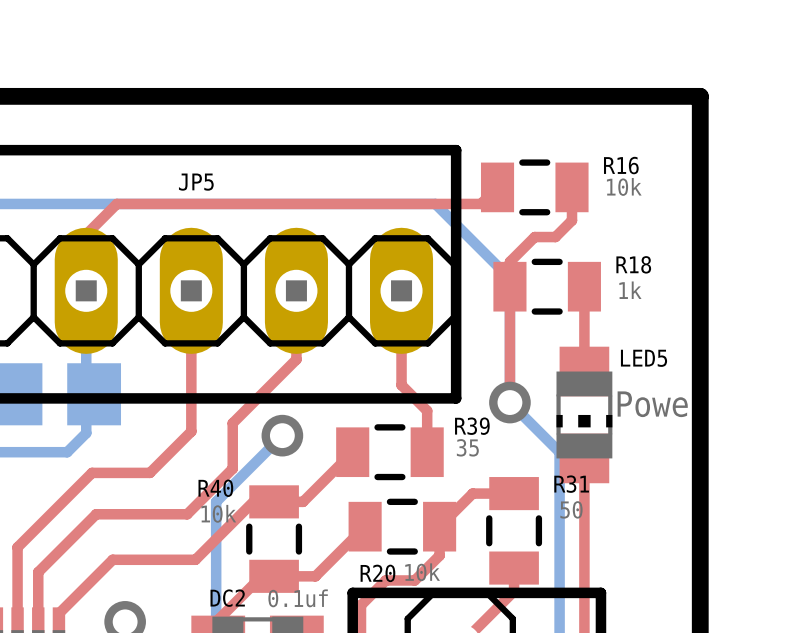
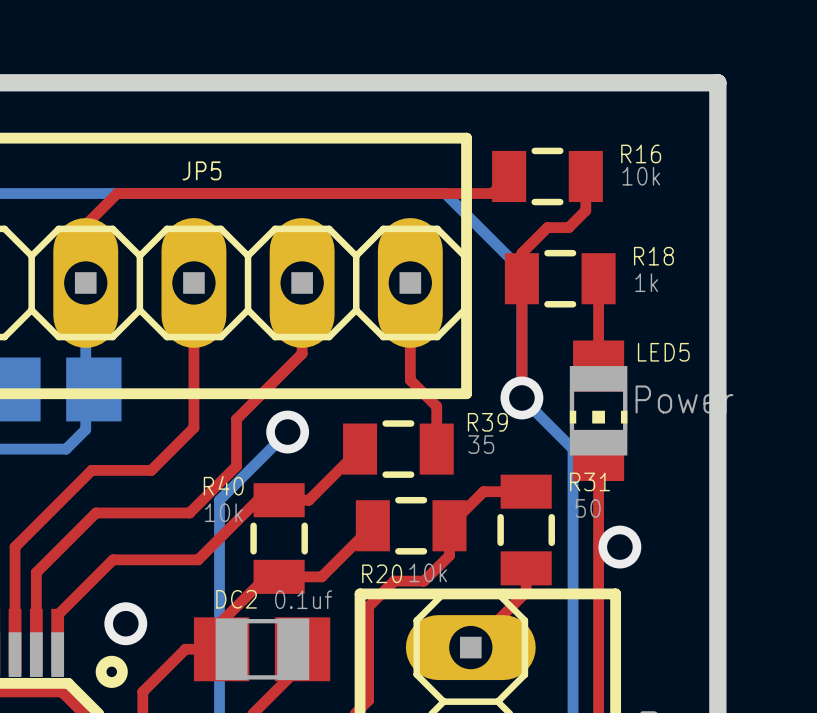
via: none -> (619, 547)

